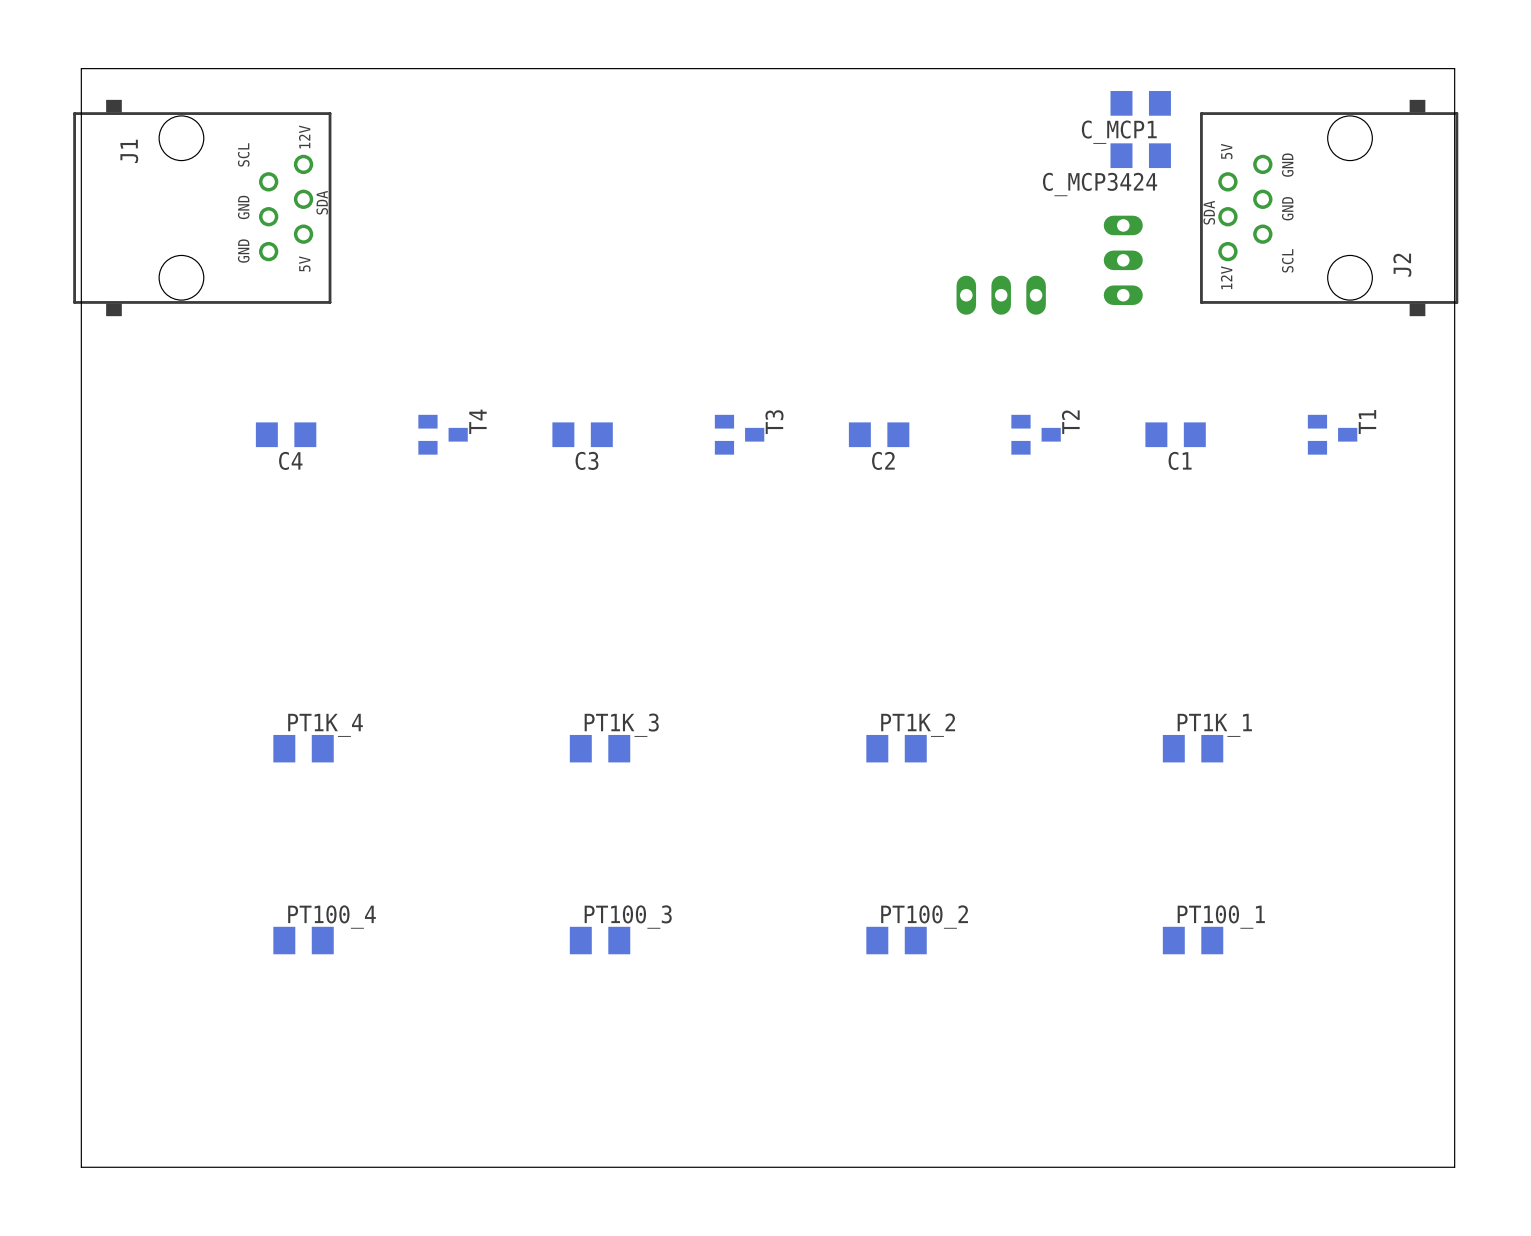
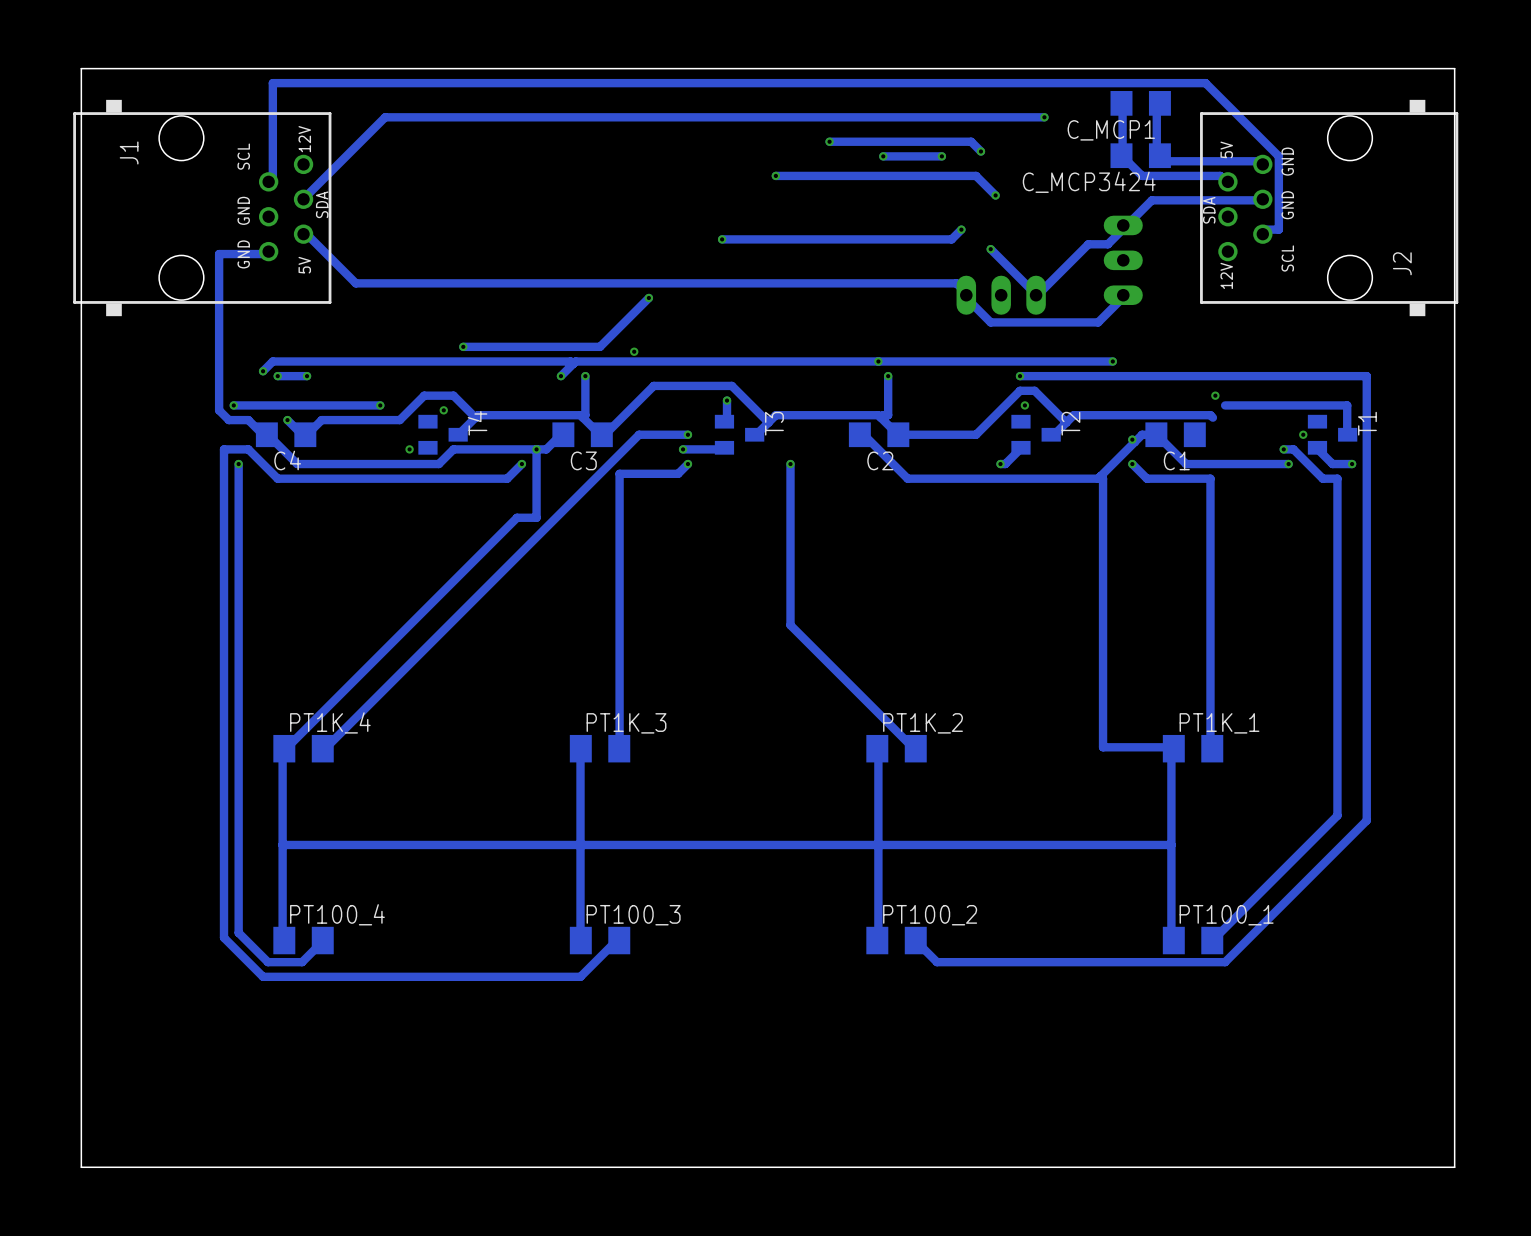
track: none -> (1121, 103) (1121, 155) (1142, 175) (1220, 175) (1227, 181)
track: none -> (1159, 103) (1156, 107) (1156, 151) (1166, 161) (1259, 161) (1262, 164)
track: none -> (1044, 117) (385, 117) (303, 199)
via: none -> (1044, 117)
track: none -> (829, 141) (971, 141) (980, 151)
via: none -> (829, 141)
via: none -> (980, 151)
via: none -> (883, 156)
track: none -> (941, 156) (883, 156)
via: none -> (941, 156)
track: none -> (775, 175) (976, 175) (995, 195)
via: none -> (775, 175)
track: none -> (268, 181) (272, 180) (272, 83) (1205, 83) (1278, 156) (1278, 229) (1264, 229) (1262, 234)
via: none -> (995, 195)
track: none -> (1262, 199) (1151, 200) (1127, 224) (1123, 225) (1122, 229) (1107, 244) (1088, 244) (1036, 295) (990, 249)
track: none -> (961, 229) (951, 239) (722, 239)
via: none -> (961, 229)
track: none -> (303, 234) (307, 234) (355, 283) (956, 283) (966, 293) (966, 298) (990, 322) (1098, 322) (1123, 295)
via: none -> (722, 239)
via: none -> (990, 249)
track: none -> (268, 251) (267, 254) (219, 254) (219, 410) (228, 420) (248, 420) (263, 434) (267, 434) (297, 464) (438, 464) (453, 449) (546, 449) (560, 434) (563, 434)
track: none -> (648, 298) (600, 346) (463, 346)
via: none -> (648, 298)
via: none -> (463, 346)
via: none -> (634, 351)
via: none -> (878, 361)
track: none -> (1112, 361) (575, 361) (560, 376)
via: none -> (1112, 361)
track: none -> (573, 363) (570, 361) (272, 361) (263, 371)
via: none -> (263, 371)
via: none -> (277, 376)
track: none -> (307, 376) (277, 376)
via: none -> (307, 376)
via: none -> (560, 376)
track: none -> (585, 376) (585, 415) (582, 417)
via: none -> (585, 376)
track: none -> (888, 376) (888, 415) (883, 415) (880, 417)
via: none -> (888, 376)
track: none -> (1020, 376) (1366, 376) (1366, 820) (1225, 962) (937, 962) (915, 940)
via: none -> (1020, 376)
via: none -> (1215, 395)
track: none -> (727, 400) (727, 420) (724, 421)
via: none -> (727, 400)
via: none -> (233, 405)
track: none -> (380, 405) (233, 405)
via: none -> (380, 405)
via: none -> (1024, 405)
track: none -> (1225, 405) (1347, 405) (1347, 434)
via: none -> (443, 410)
track: none -> (475, 417) (453, 395) (424, 395) (399, 420) (321, 420) (307, 434) (302, 434) (287, 420)
track: none -> (1212, 417) (1210, 415) (1073, 415) (1054, 434) (1051, 434)
via: none -> (287, 420)
track: none -> (768, 422) (731, 385) (653, 385) (604, 434) (600, 434) (580, 415) (477, 415) (458, 434)
track: none -> (1066, 422) (1034, 390) (1020, 390) (976, 434) (897, 434) (878, 415) (775, 415) (754, 434)
track: none -> (687, 434) (639, 434) (326, 747) (322, 748)
via: none -> (687, 434)
track: none -> (859, 434) (863, 434) (907, 478) (1098, 478) (1142, 434) (1156, 434) (1186, 464) (1288, 464)
via: none -> (1303, 434)
via: none -> (1132, 439)
track: none -> (724, 447) (722, 449) (683, 449)
track: none -> (1020, 447) (1005, 464) (1000, 464)
track: none -> (1317, 447) (1332, 464) (1352, 464)
via: none -> (409, 449)
track: none -> (536, 449) (536, 517) (517, 517) (284, 748) (282, 752) (282, 937) (284, 940)
via: none -> (536, 449)
via: none -> (683, 449)
track: none -> (1283, 449) (1293, 449) (1322, 478) (1337, 478) (1337, 815) (1212, 940)
via: none -> (1283, 449)
track: none -> (238, 464) (238, 932) (267, 962) (302, 962) (322, 940)
via: none -> (238, 464)
track: none -> (521, 464) (507, 478) (277, 478) (248, 449) (224, 449) (224, 937) (263, 976) (580, 976) (614, 942) (619, 940)
via: none -> (521, 464)
track: none -> (687, 464) (678, 473) (619, 473) (619, 748)
via: none -> (687, 464)
track: none -> (790, 464) (790, 625) (915, 748)
via: none -> (790, 464)
via: none -> (1000, 464)
track: none -> (1132, 464) (1146, 478) (1210, 478) (1210, 747) (1212, 748)
via: none -> (1132, 464)
via: none -> (1288, 464)
via: none -> (1352, 464)
track: none -> (1100, 476) (1103, 478) (1103, 747) (1173, 748) (1171, 752) (1171, 937) (1173, 940)
track: none -> (580, 748) (580, 940)
track: none -> (877, 748) (877, 940)
track: none -> (1171, 844) (282, 844)

